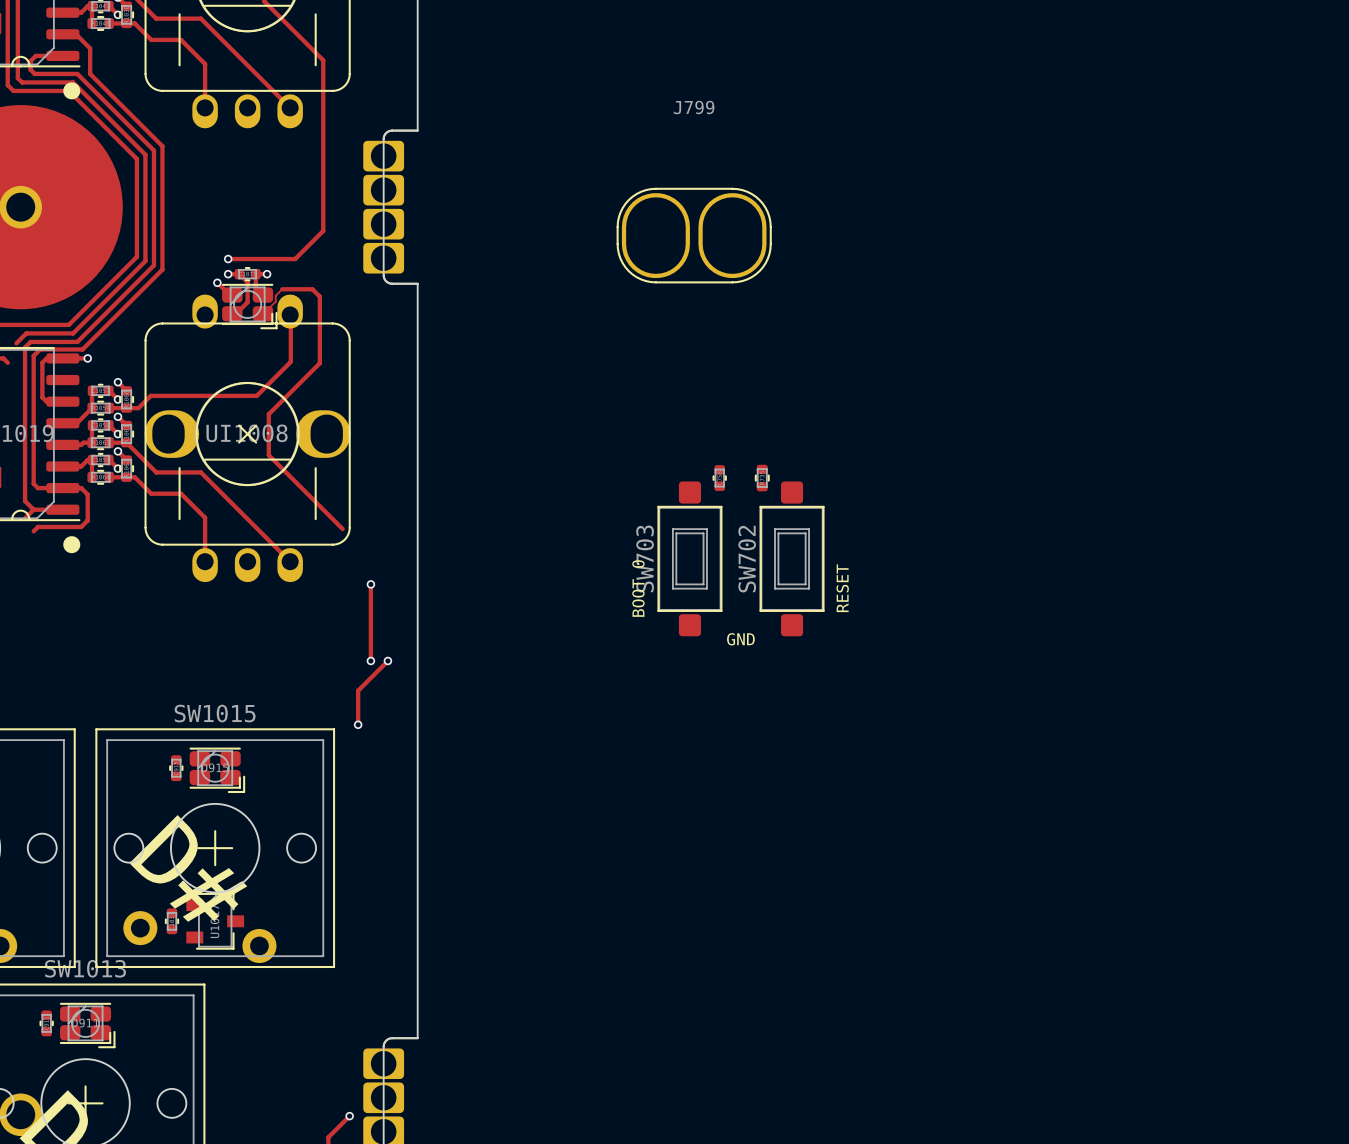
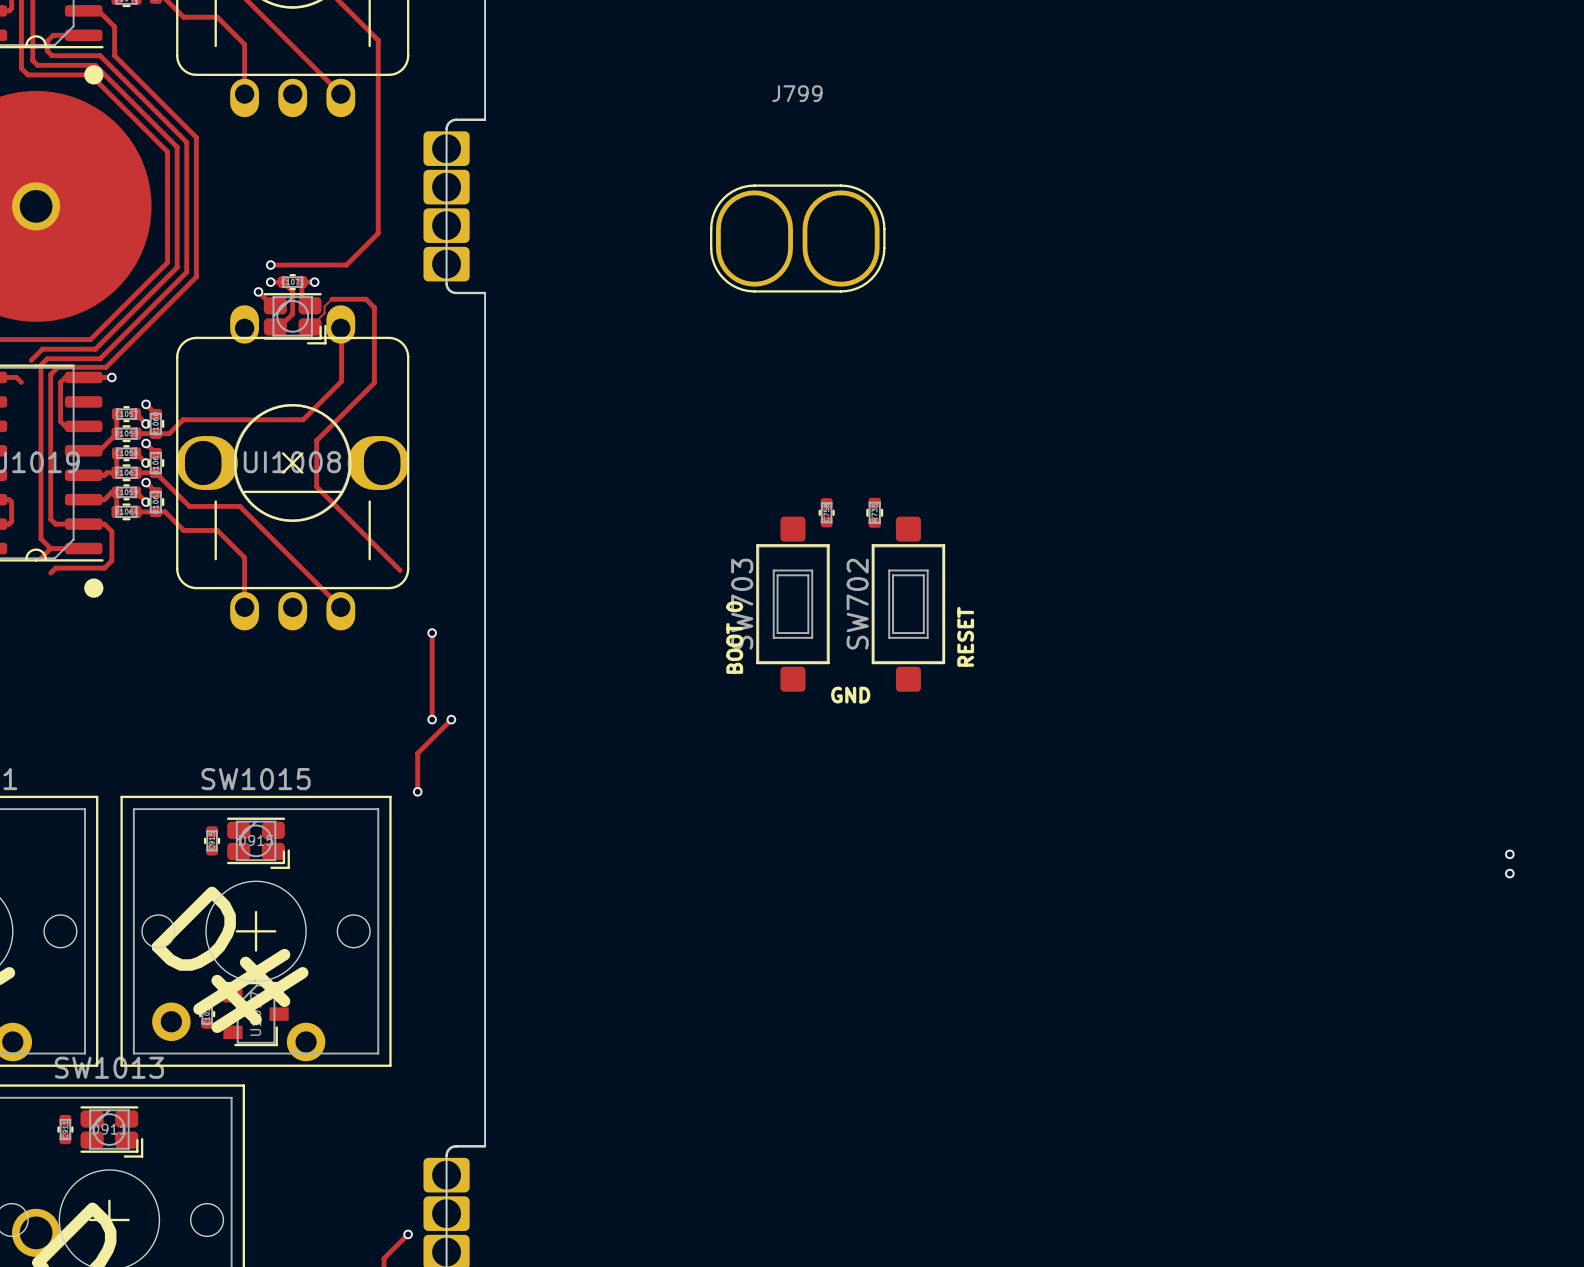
via: none -> (1509, 854)
via: none -> (1509, 873)

